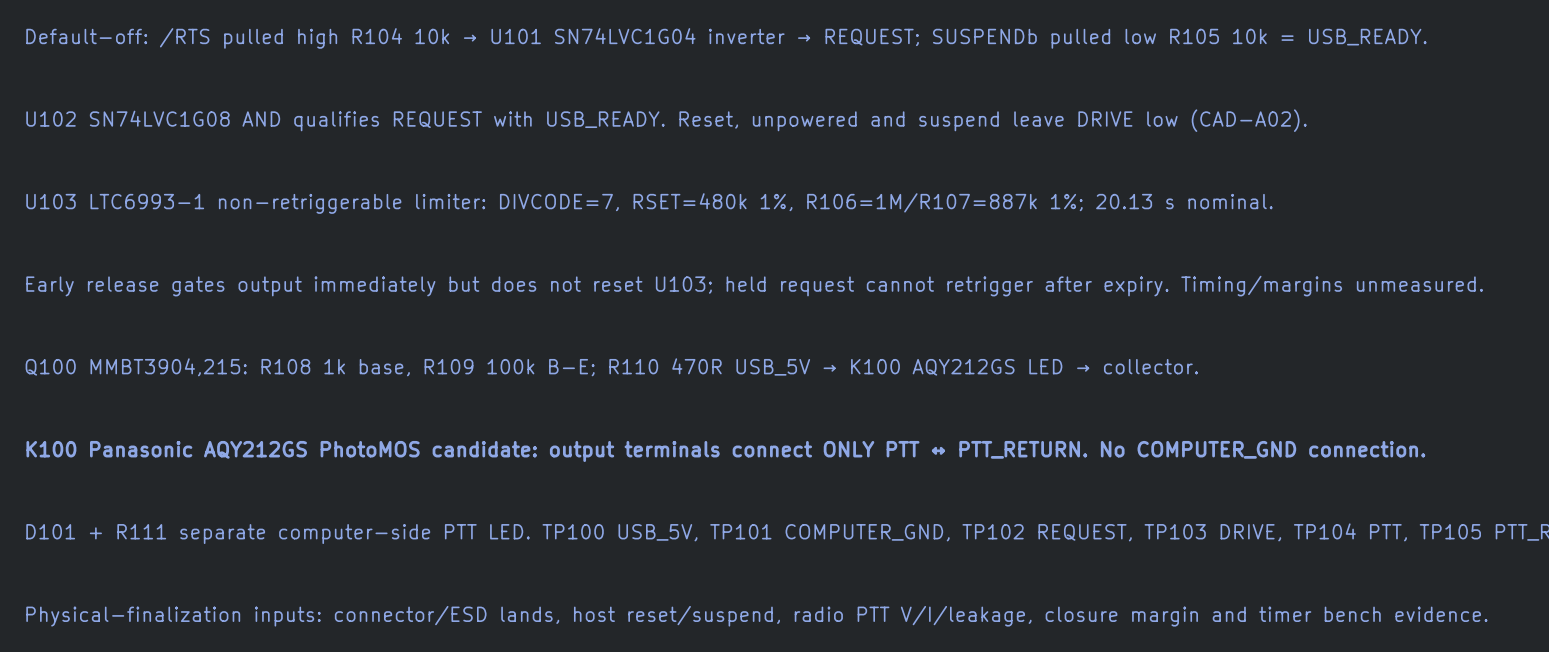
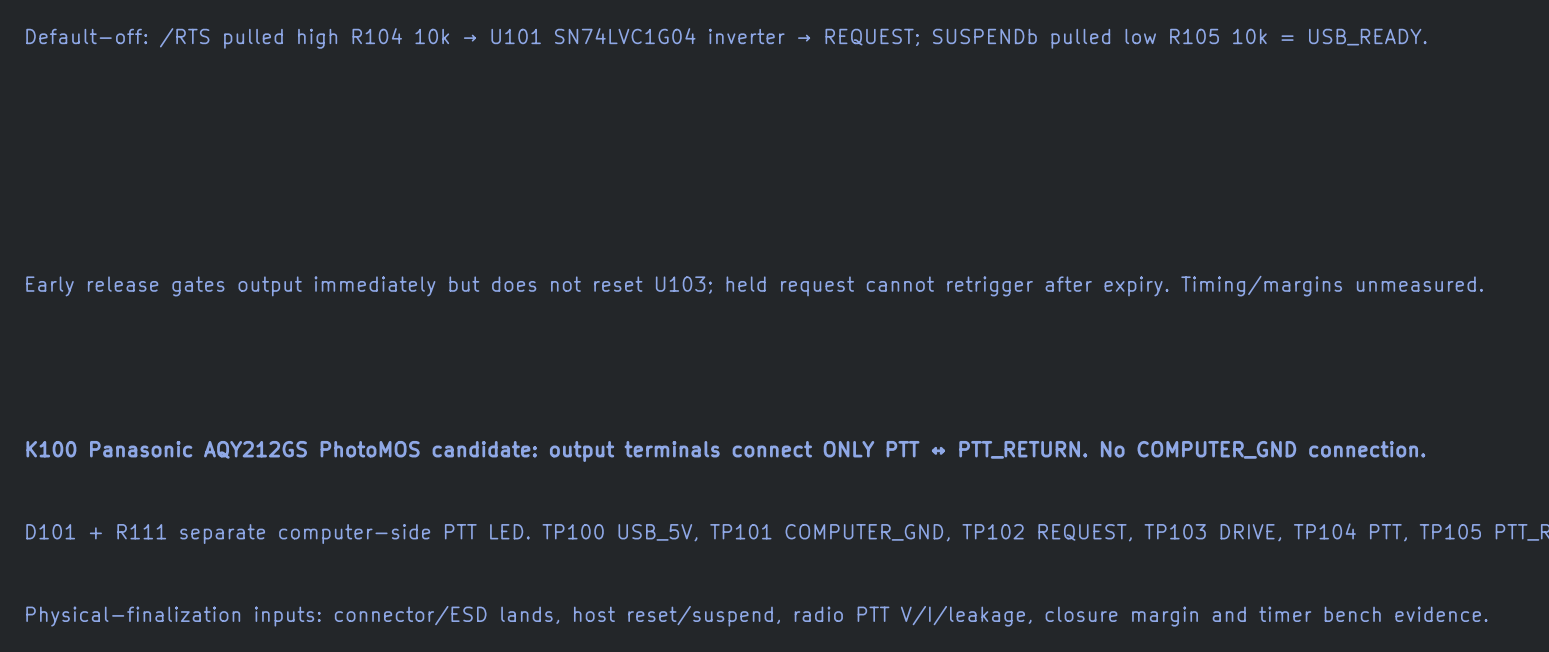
text: U102 SN74LVC1G08 AND qualifies REQUEST with USB_READY. Reset, unpowered and suspend leave DRIVE low (CAD-A02). (666, 120) -> none
text: U103 LTC6993-1 non-retriggerable limiter: DIVCODE=7, RSET=480k 1%, R106=1M/R107=887k 1%; 20.13 s nominal. (649, 203) -> none
text: Q100 MMBT3904,215: R108 1k base, R109 100k B-E; R110 470R USB_5V → K100 AQY212GS LED → collector. (611, 367) -> none

